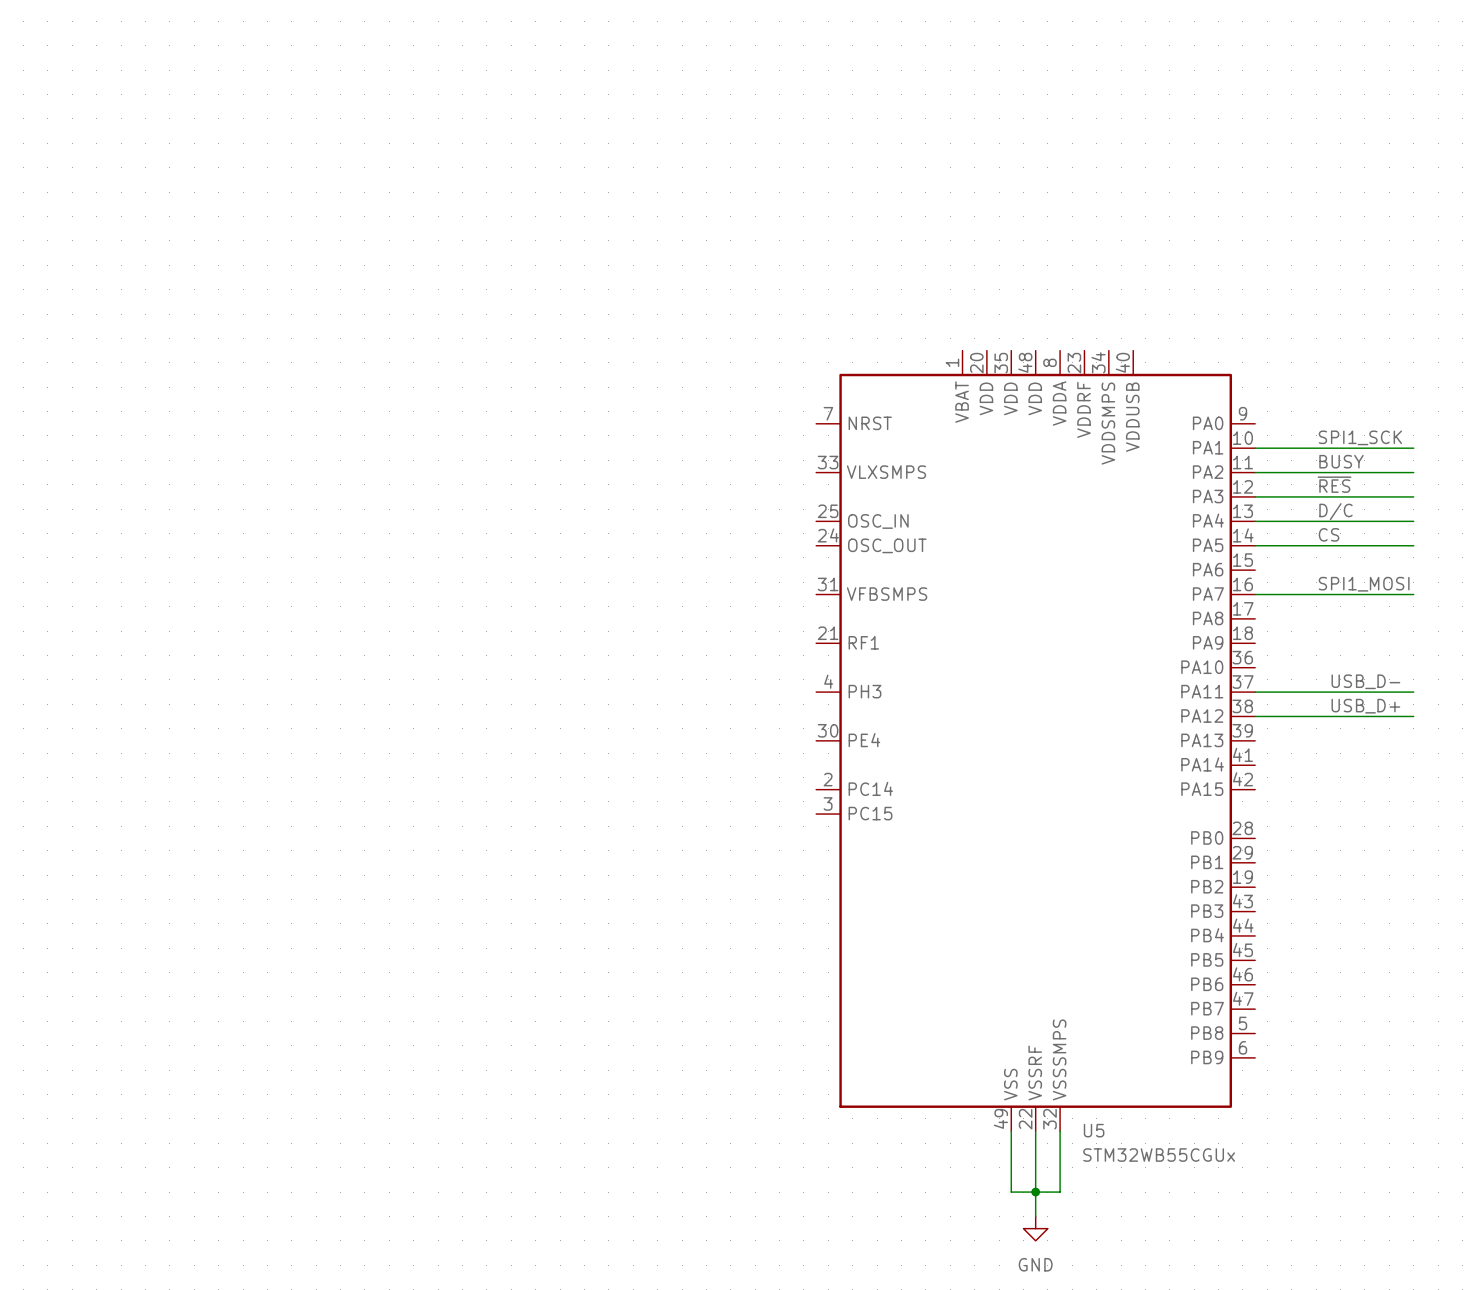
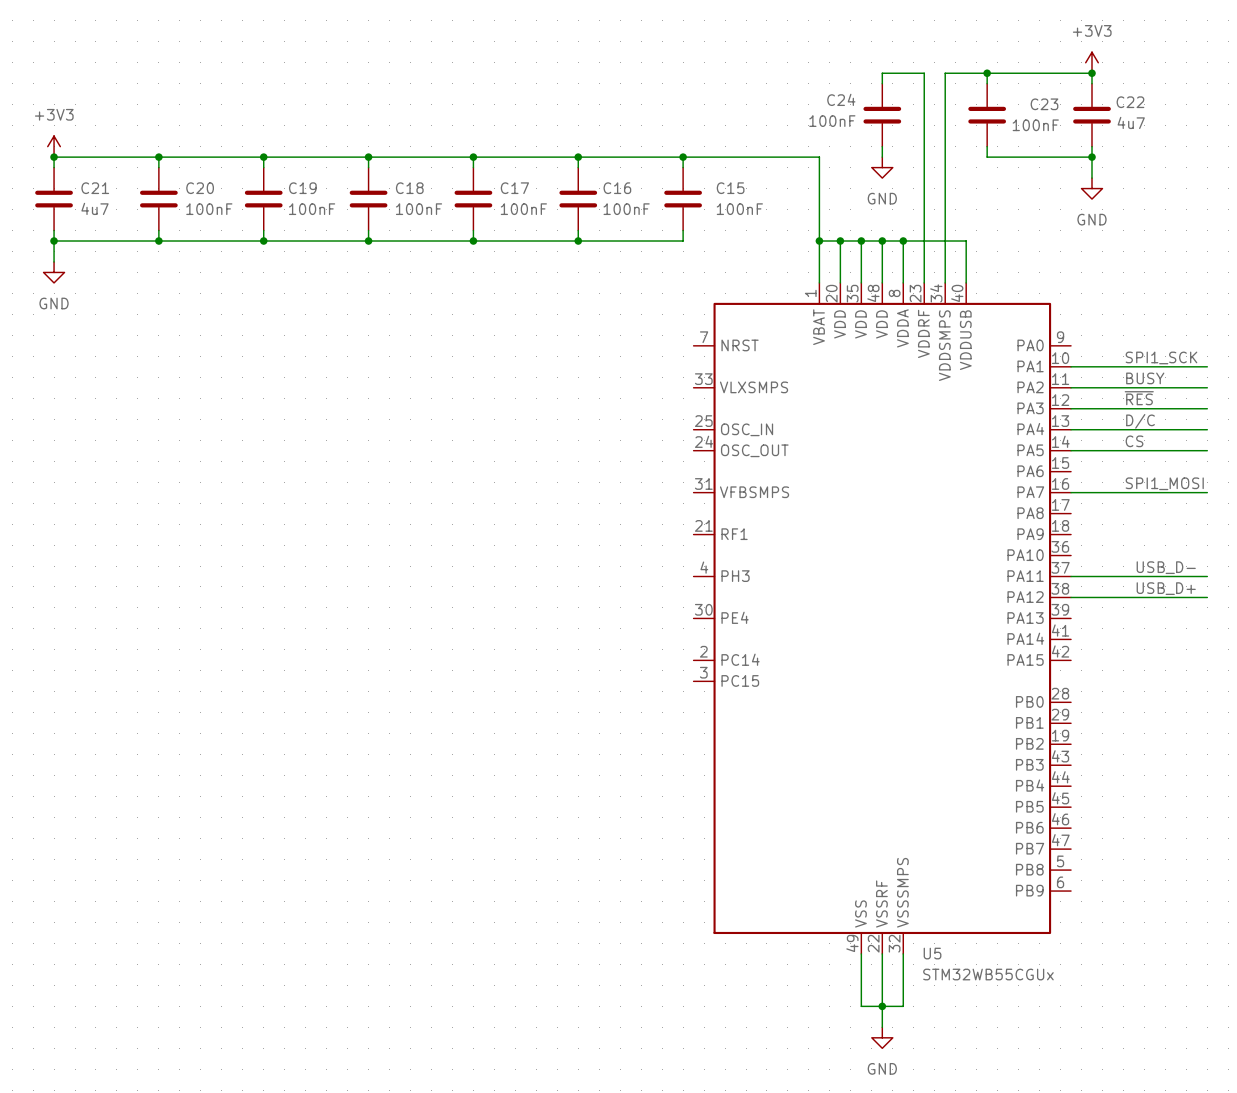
power symbol: none -> +3V3 (1092, 62)
wire: none -> (987, 73) (987, 83)
junction: none -> (987, 73)
junction: none -> (1092, 73)
wire: none -> (882, 83) (882, 73) (924, 73) (924, 282)
wire: none -> (1092, 83) (1092, 73) (945, 73) (945, 282)
C24: none -> 100nF (882, 115)
C23: none -> 100nF (987, 115)
C22: none -> 4u7 (1092, 115)
power symbol: none -> +3V3 (54, 146)
wire: none -> (882, 146) (882, 157)
wire: none -> (987, 146) (987, 157) (1092, 157)
wire: none -> (1092, 146) (1092, 178)
junction: none -> (54, 157)
wire: none -> (158, 157) (158, 167)
junction: none -> (158, 157)
wire: none -> (263, 157) (263, 167)
junction: none -> (263, 157)
wire: none -> (368, 157) (368, 167)
junction: none -> (368, 157)
wire: none -> (473, 157) (473, 167)
junction: none -> (473, 157)
wire: none -> (578, 157) (578, 167)
junction: none -> (578, 157)
wire: none -> (683, 157) (683, 167)
junction: none -> (683, 157)
junction: none -> (1092, 157)
wire: none -> (54, 167) (54, 157) (819, 157) (819, 282)
power symbol: none -> GND (882, 167)
power symbol: none -> GND (1092, 188)
C21: none -> 4u7 (54, 199)
C20: none -> 100nF (158, 199)
C19: none -> 100nF (263, 199)
C18: none -> 100nF (368, 199)
C17: none -> 100nF (473, 199)
C16: none -> 100nF (578, 199)
C15: none -> 100nF (683, 199)
wire: none -> (54, 230) (54, 261)
wire: none -> (158, 230) (158, 241)
wire: none -> (263, 230) (263, 241)
wire: none -> (368, 230) (368, 241)
wire: none -> (473, 230) (473, 241)
wire: none -> (578, 230) (578, 241)
wire: none -> (683, 230) (683, 241) (54, 241)
junction: none -> (54, 241)
junction: none -> (158, 241)
junction: none -> (263, 241)
junction: none -> (368, 241)
junction: none -> (473, 241)
junction: none -> (578, 241)
wire: none -> (819, 241) (966, 241) (966, 282)
junction: none -> (819, 241)
wire: none -> (840, 241) (840, 282)
junction: none -> (840, 241)
wire: none -> (861, 241) (861, 282)
junction: none -> (861, 241)
wire: none -> (882, 241) (882, 282)
junction: none -> (882, 241)
wire: none -> (903, 241) (903, 282)
junction: none -> (903, 241)
power symbol: none -> GND (54, 272)

